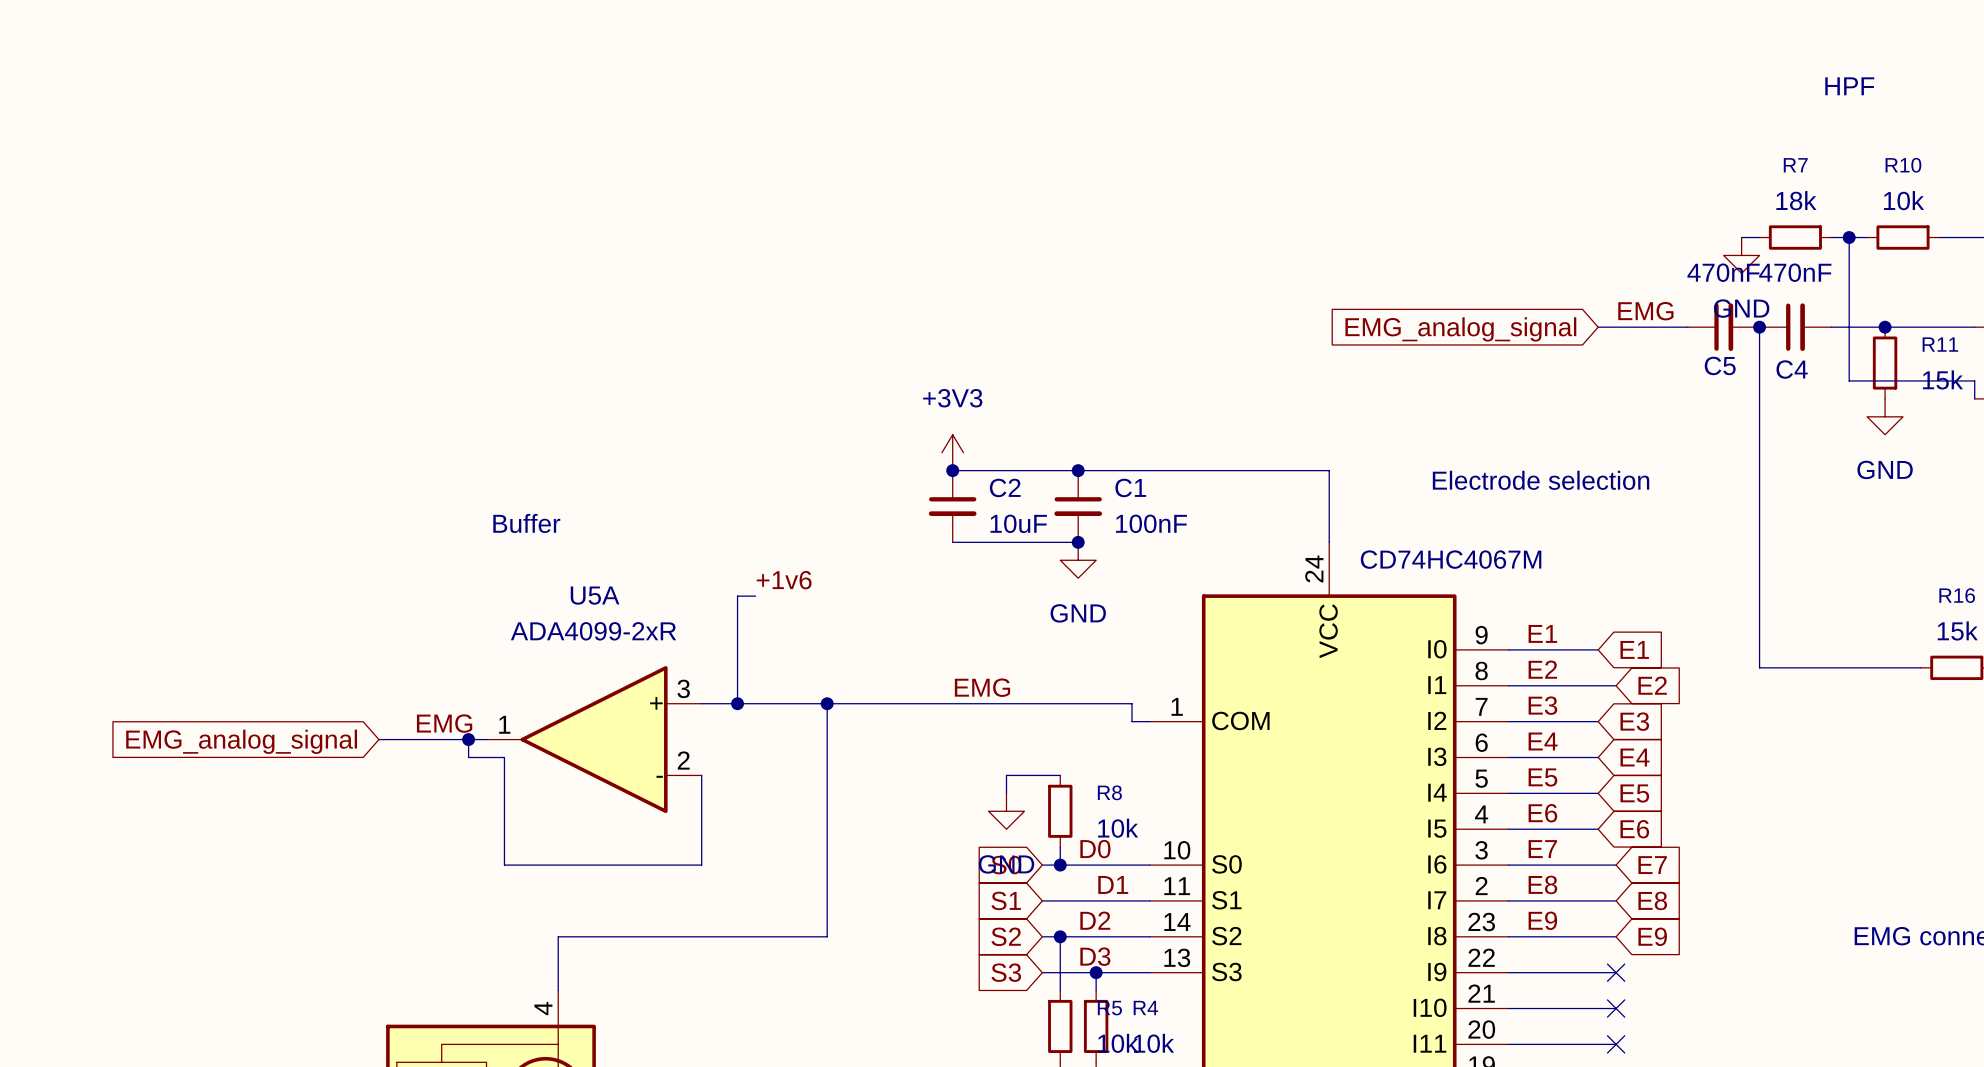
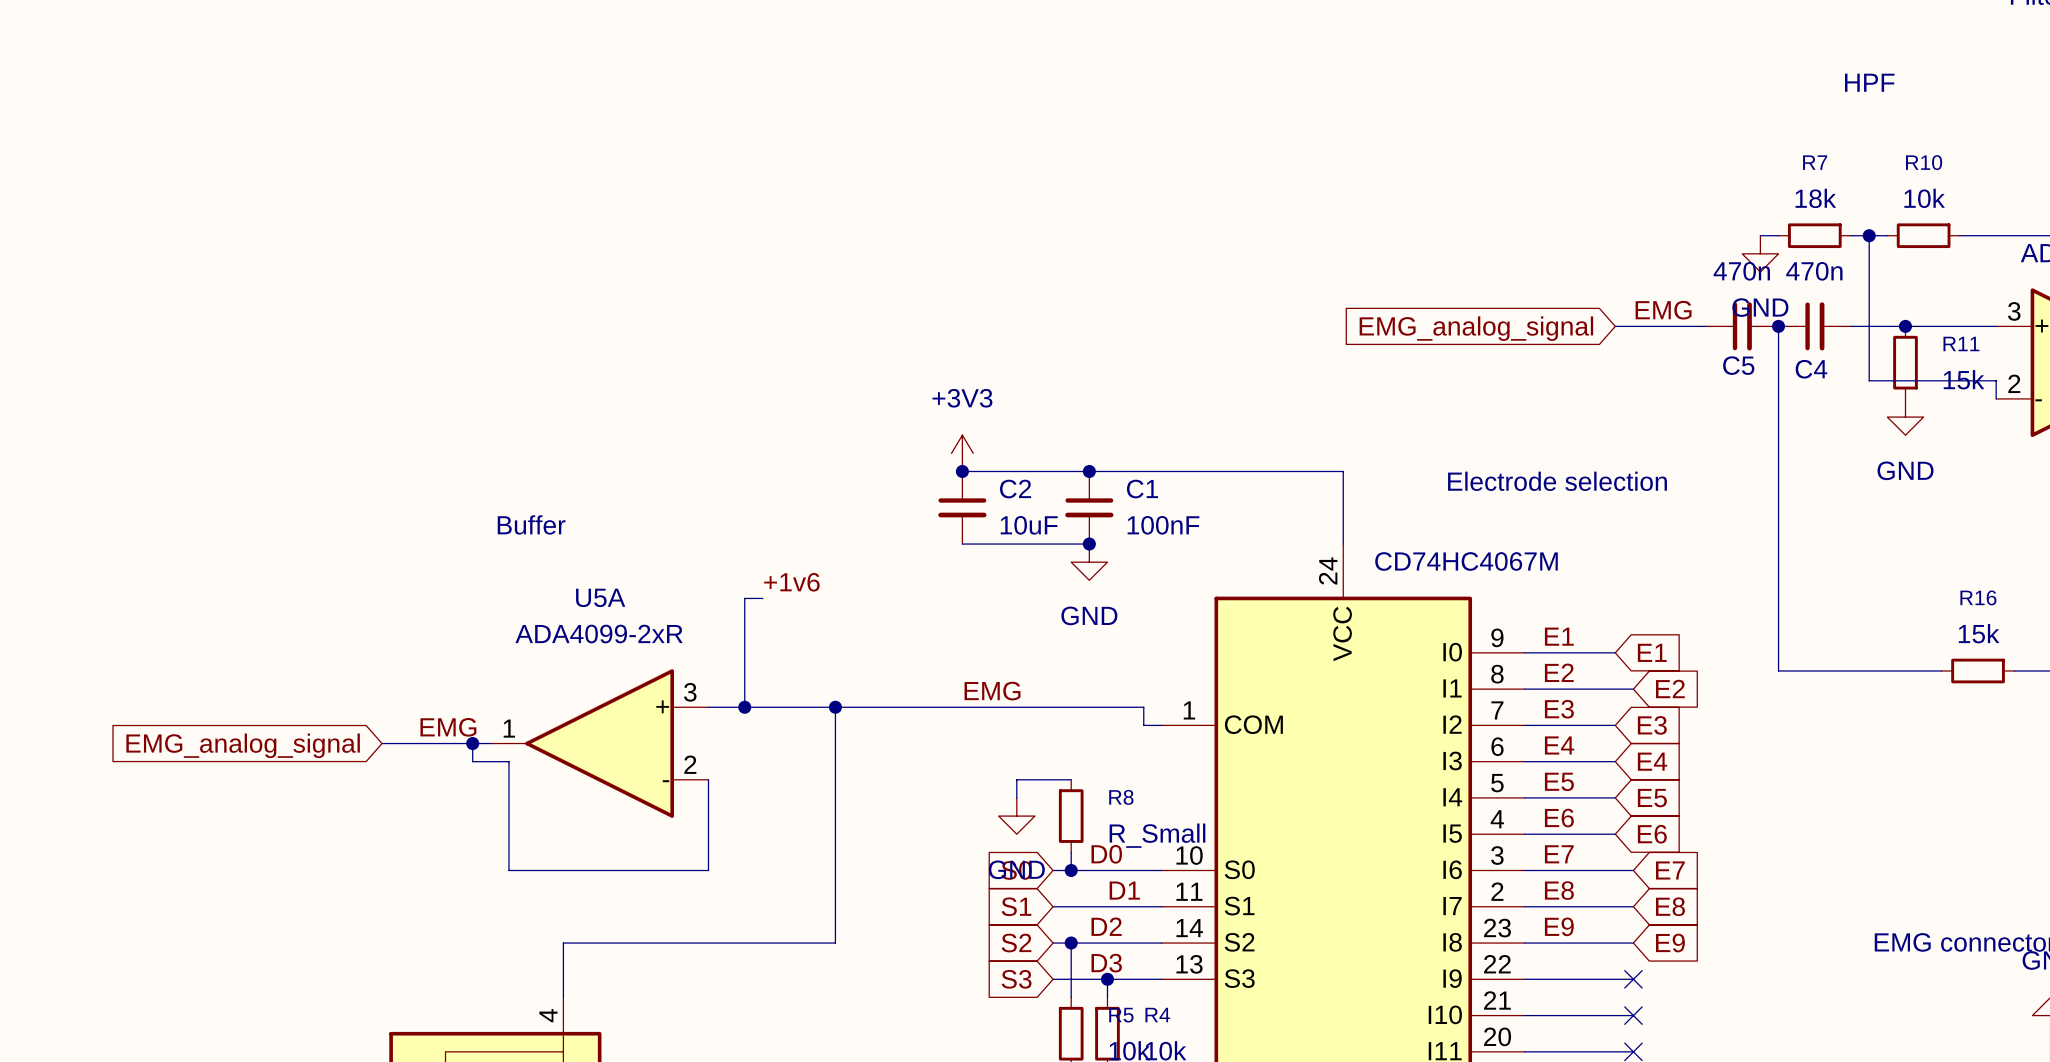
C5 value: 470nF (1723, 272) -> 470n (1741, 271)
C4 value: 470nF (1795, 272) -> 470n (1814, 271)
R8 value: 10k (1118, 828) -> R_Small (1157, 835)

